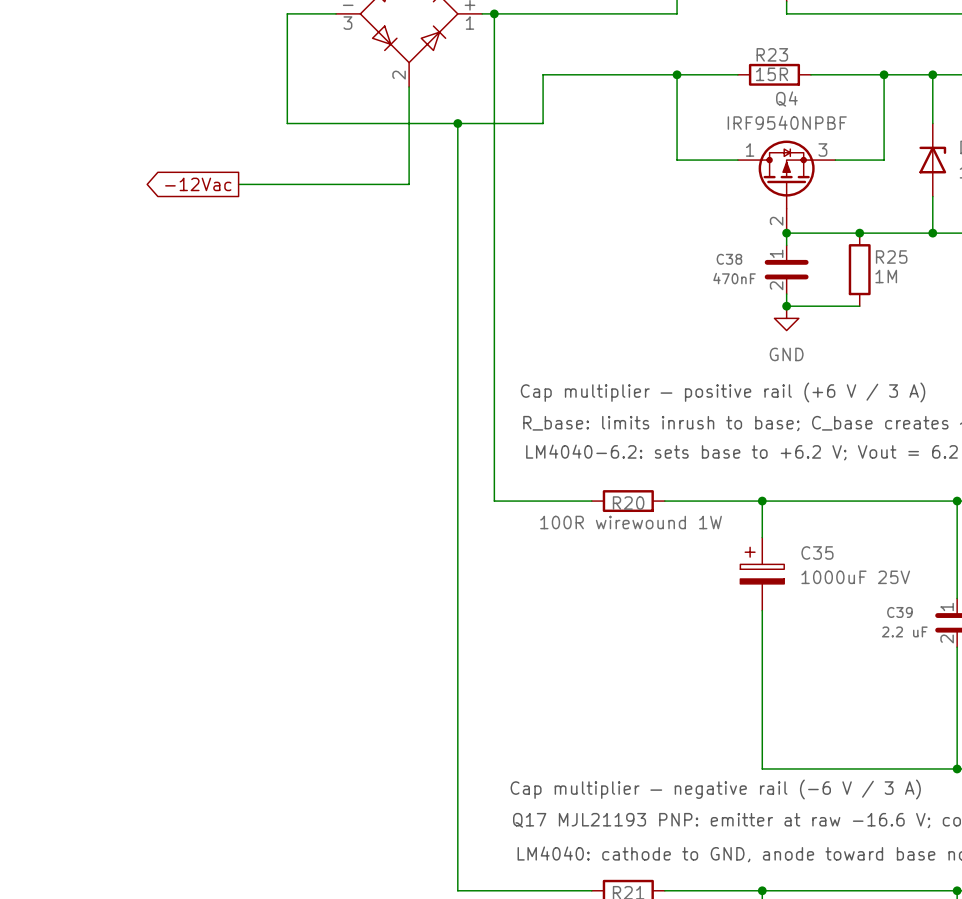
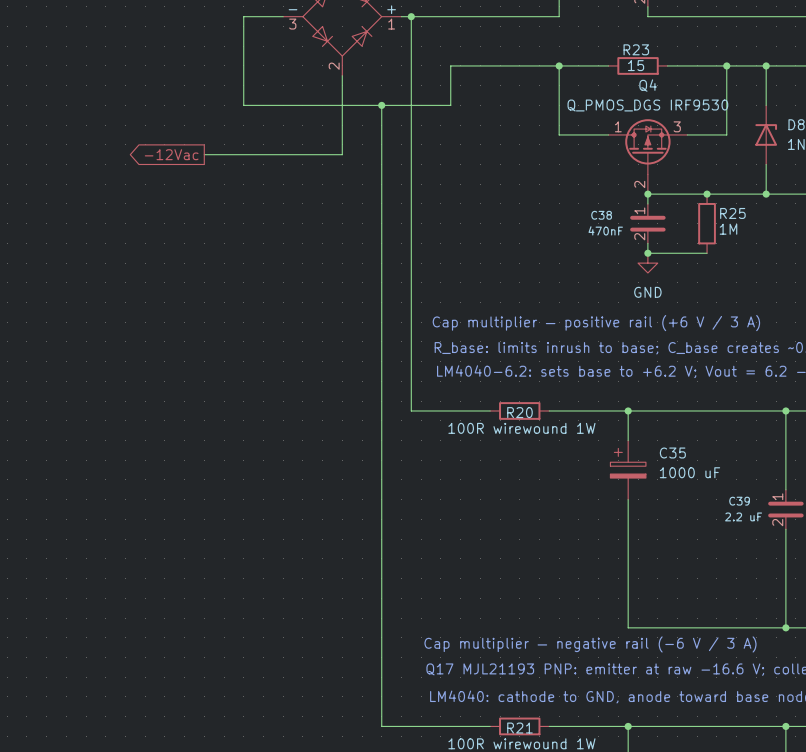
R23 value: 15R (772, 74) -> 15 (636, 65)
Q4 value: IRF9540NPBF (787, 122) -> Q_PMOS_DGS IRF9530 (647, 105)
C35 value: 1000uF 25V (855, 577) -> 1000 uF (689, 472)

